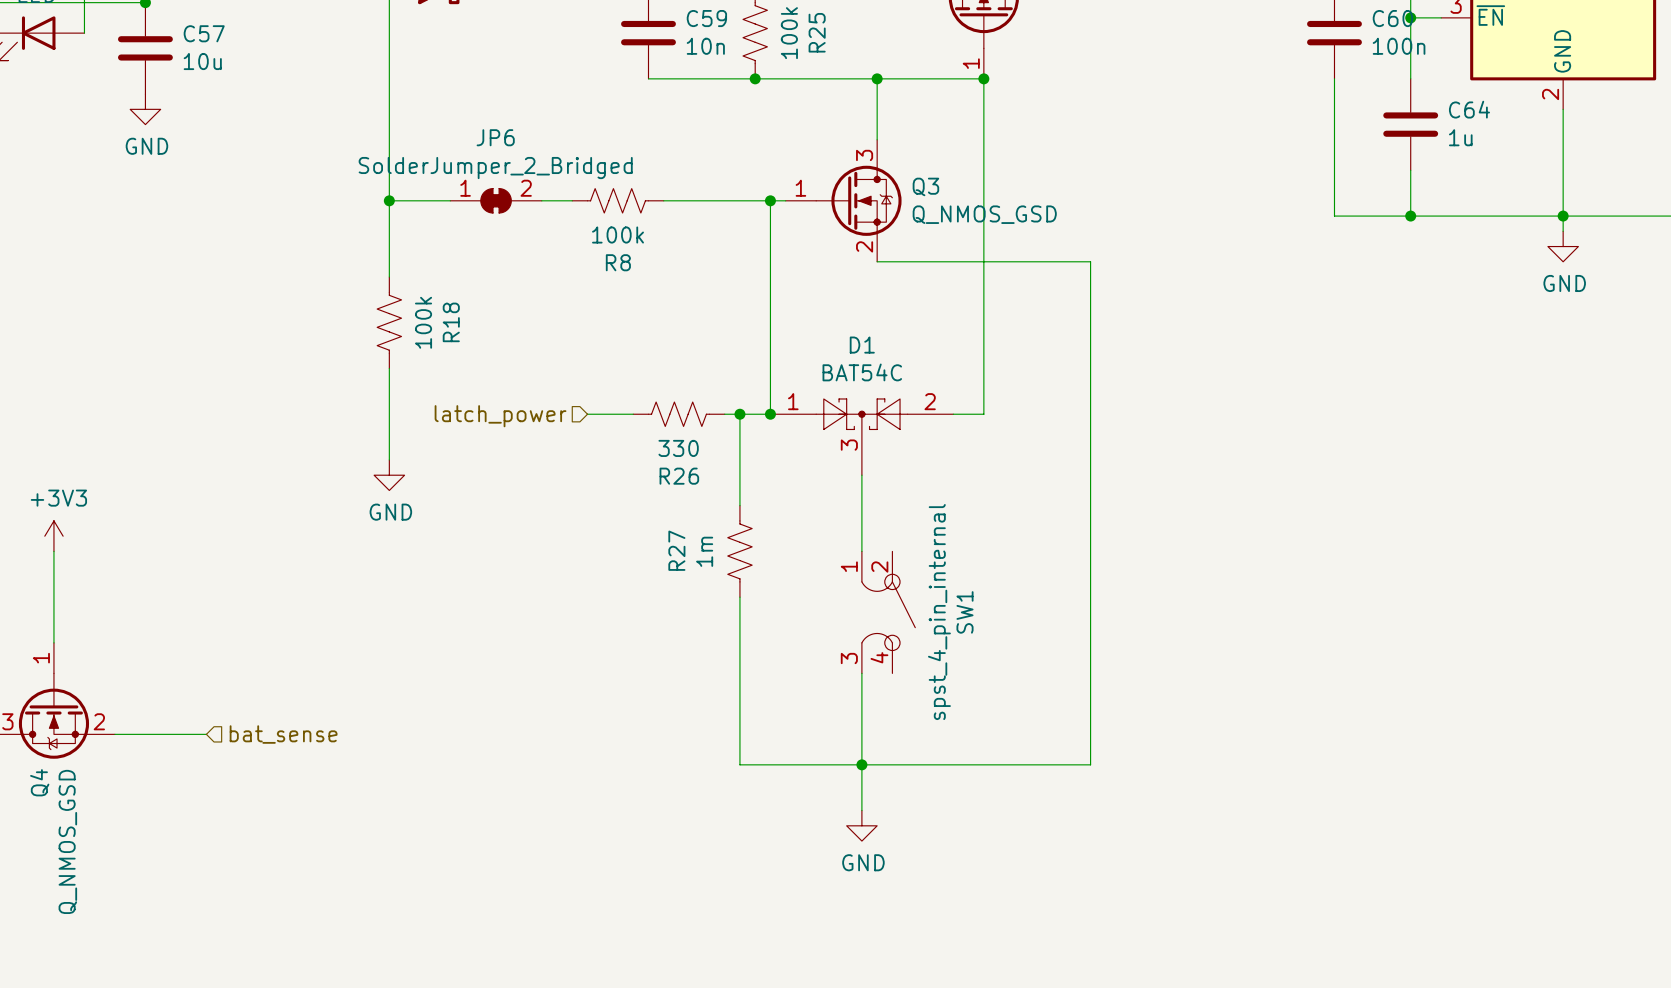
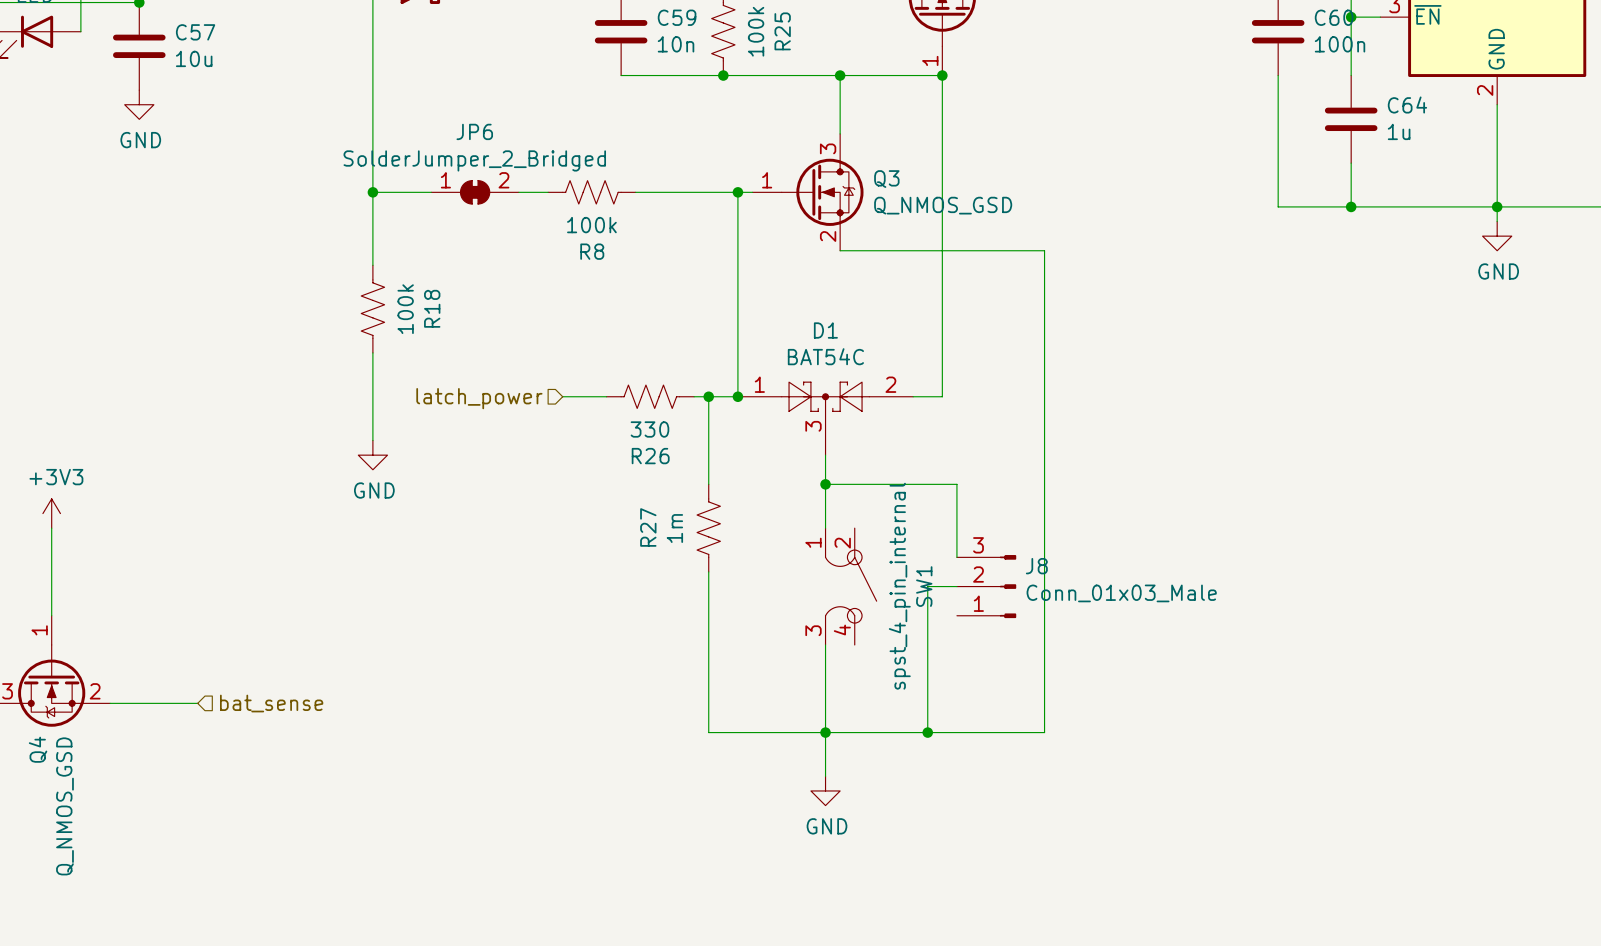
wire: none -> (825, 484) (956, 484) (956, 557)
junction: none -> (825, 484)
wire: none -> (956, 586) (927, 586) (927, 732)
J8: none -> Conn_01x03_Male (986, 586)
junction: none -> (927, 732)

